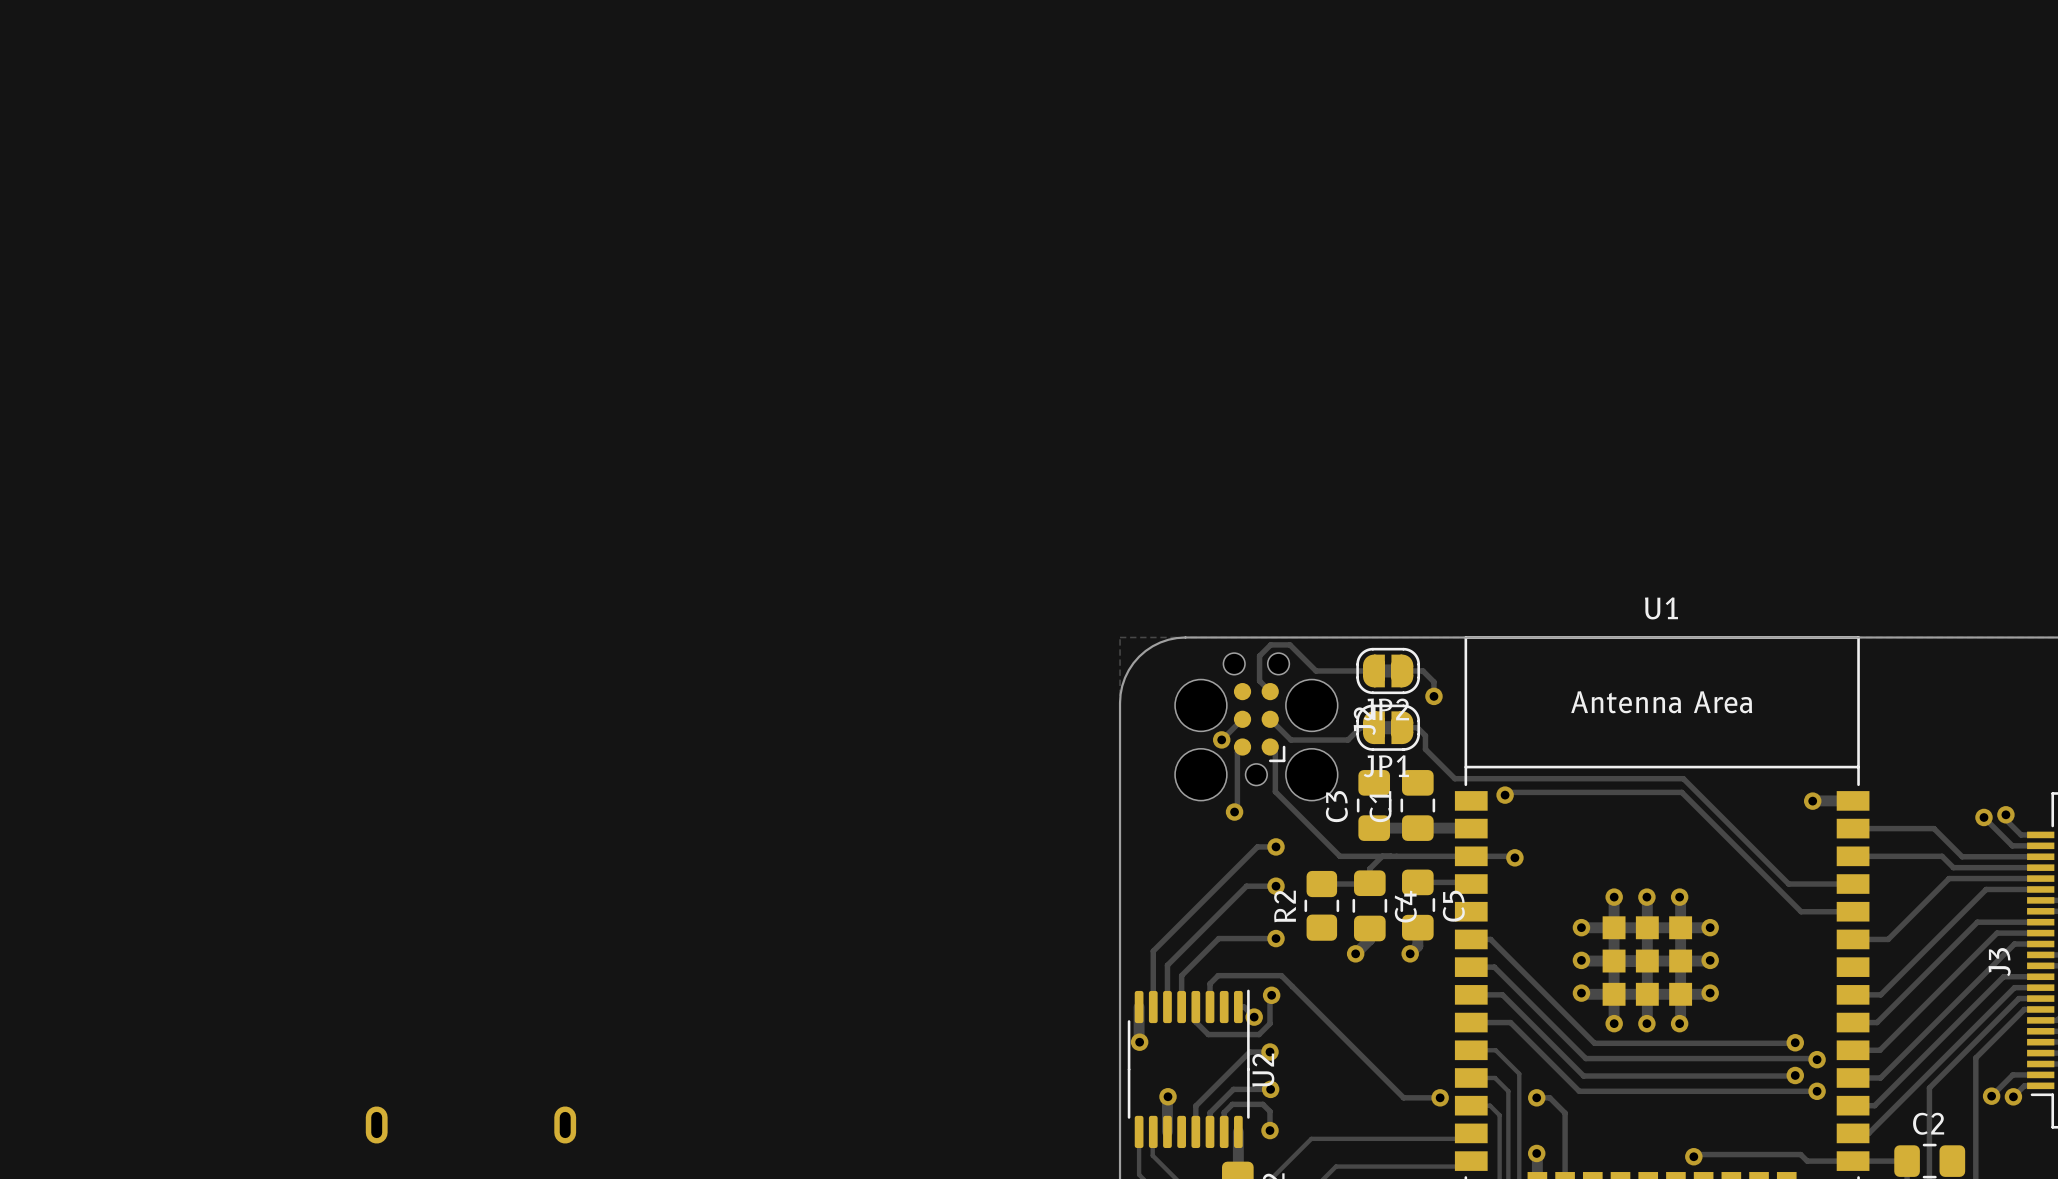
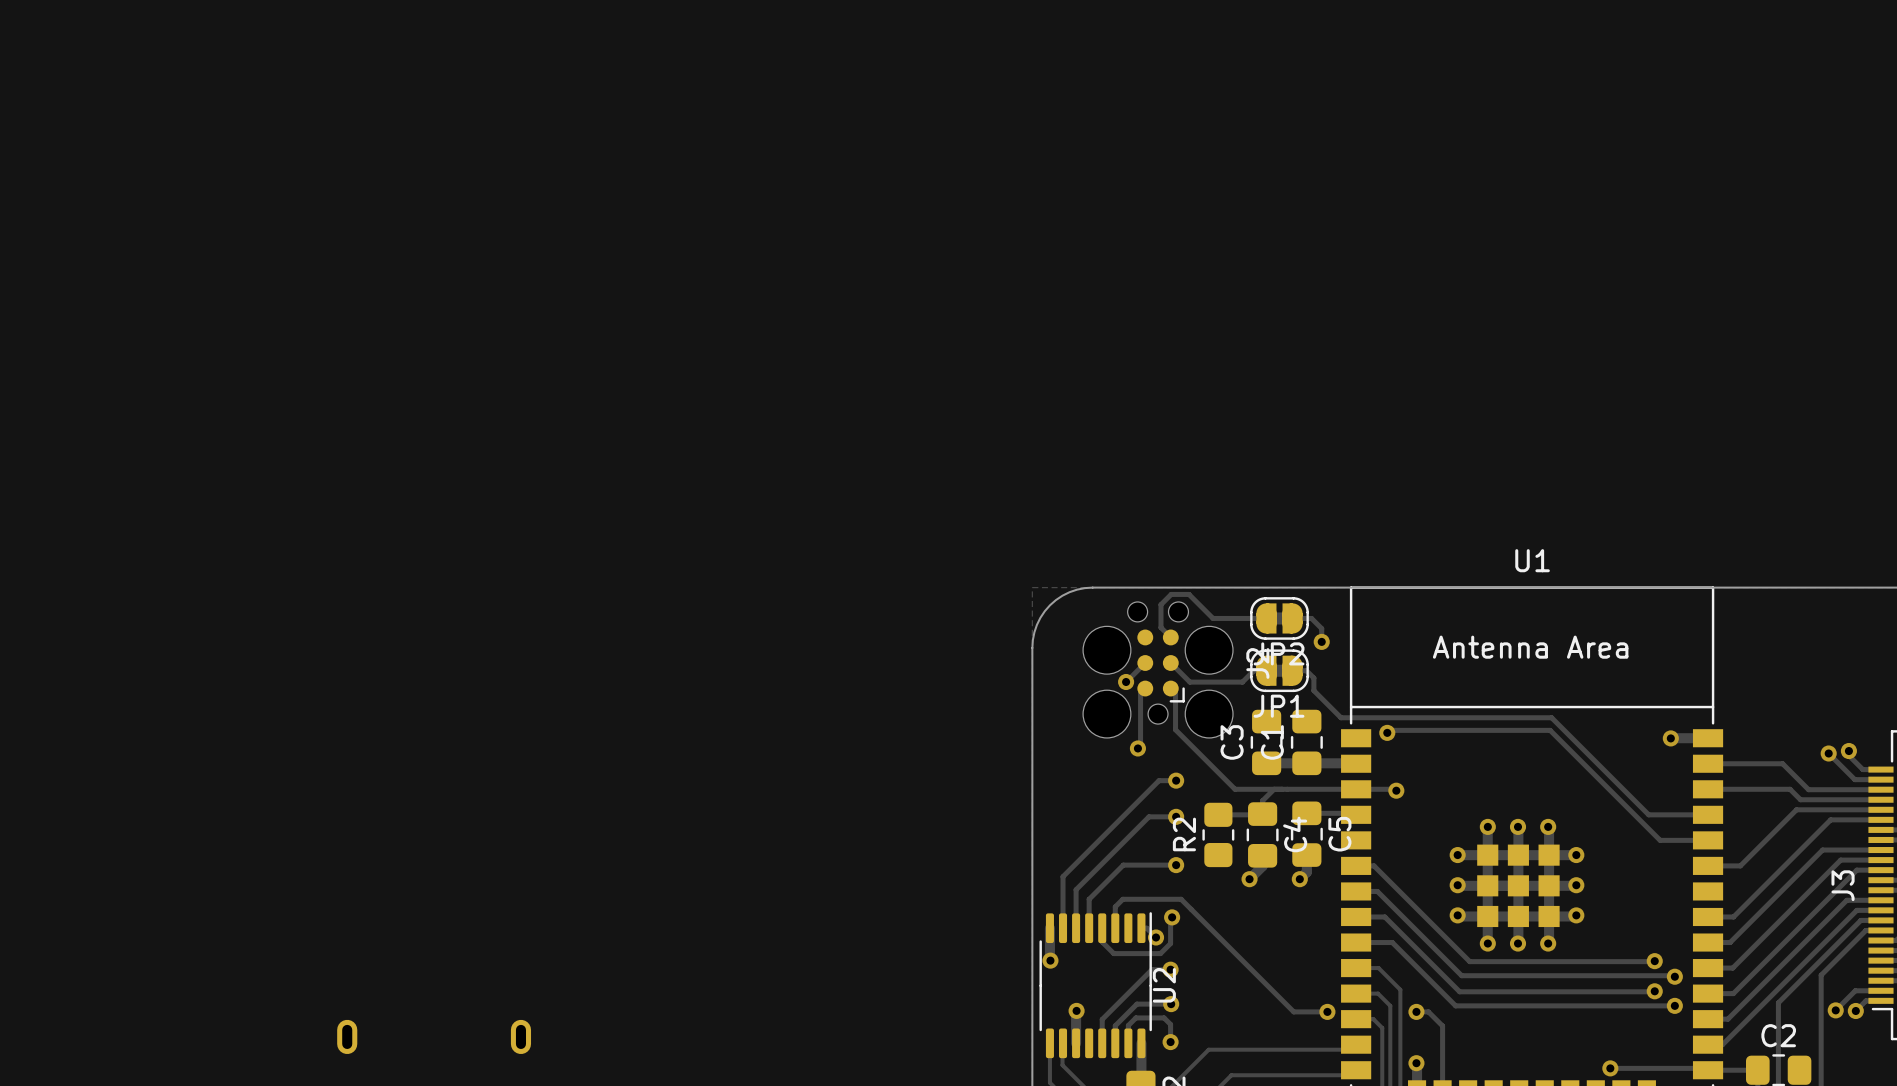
track: (1693, 1156) (1695, 1154) (1800, 1154) (1807, 1161) (1853, 1161) -> (1610, 1068) (1706, 1068) (1708, 1070)
via position: (1693, 1156) -> (1610, 1068)

